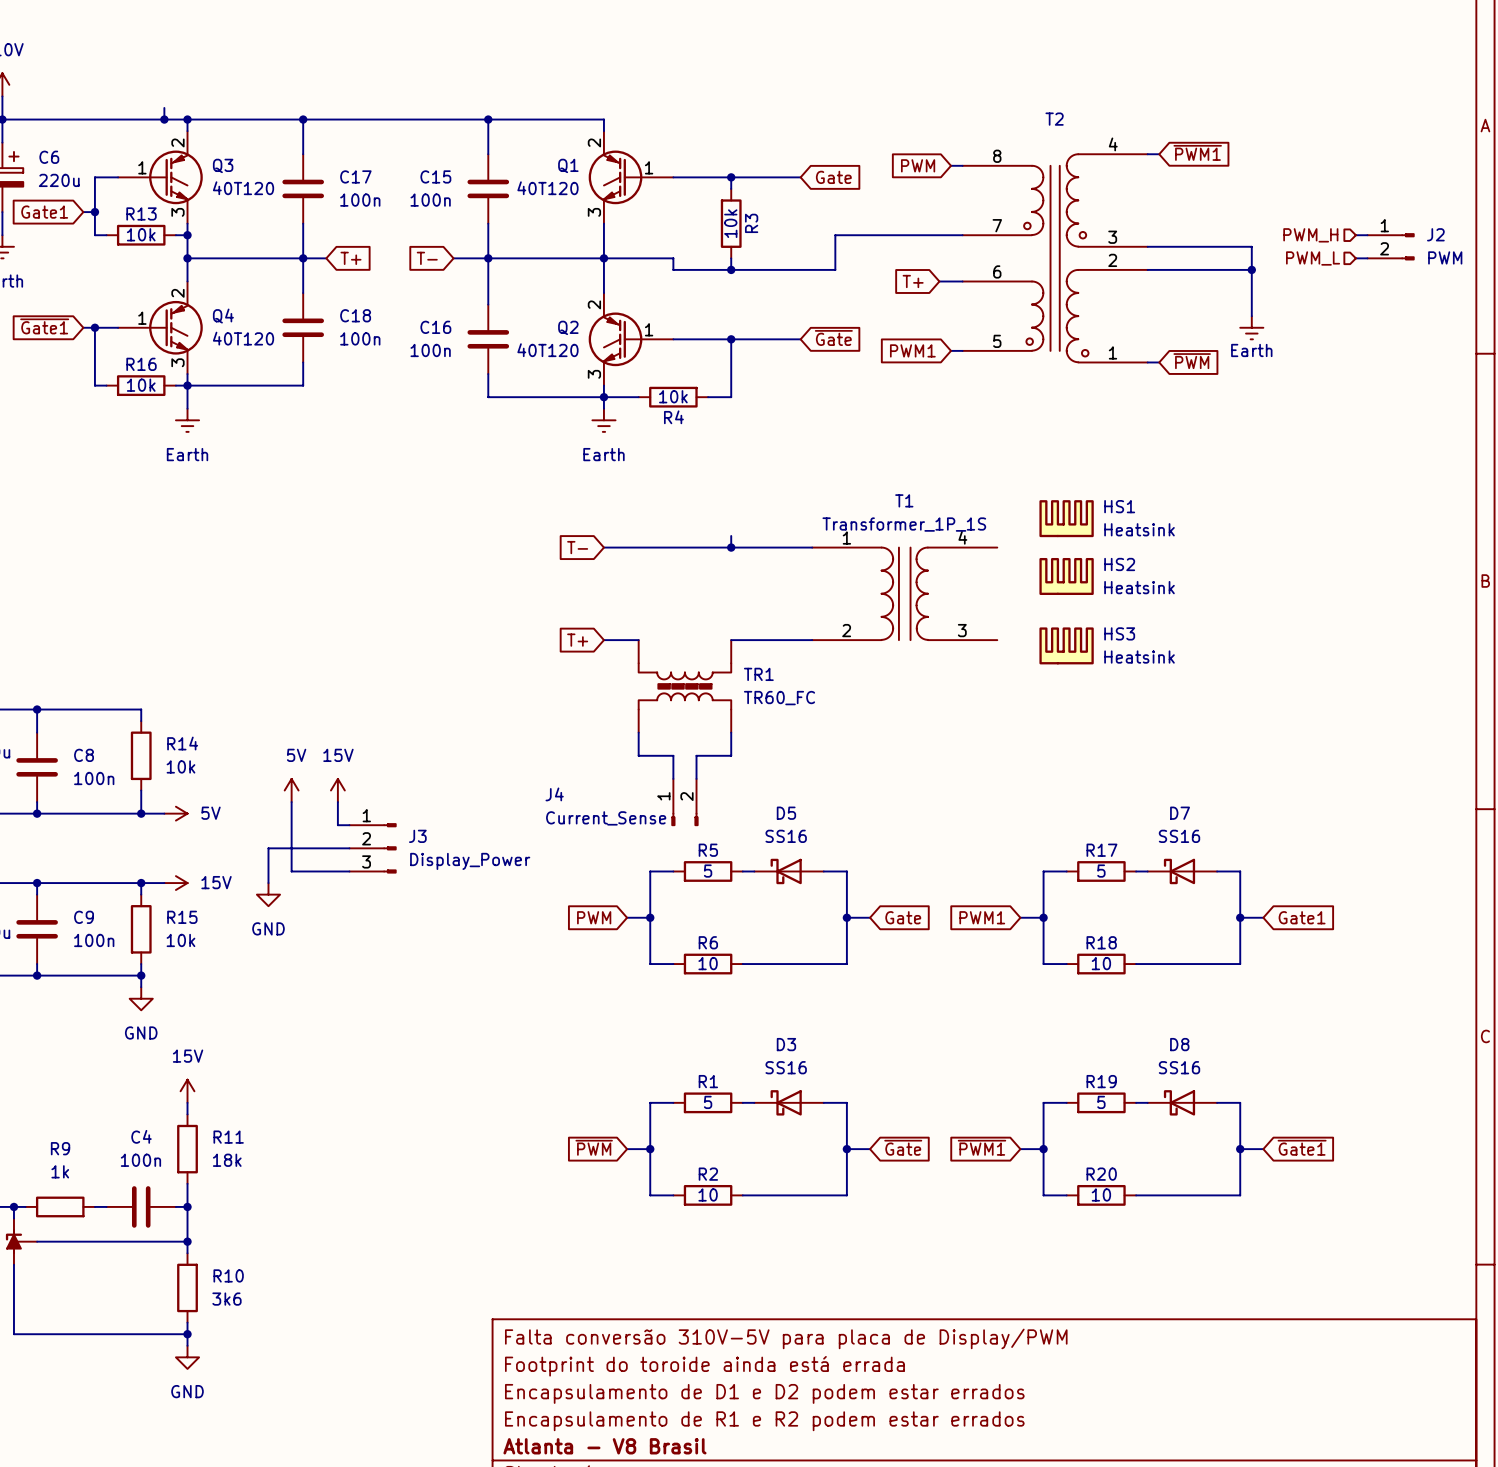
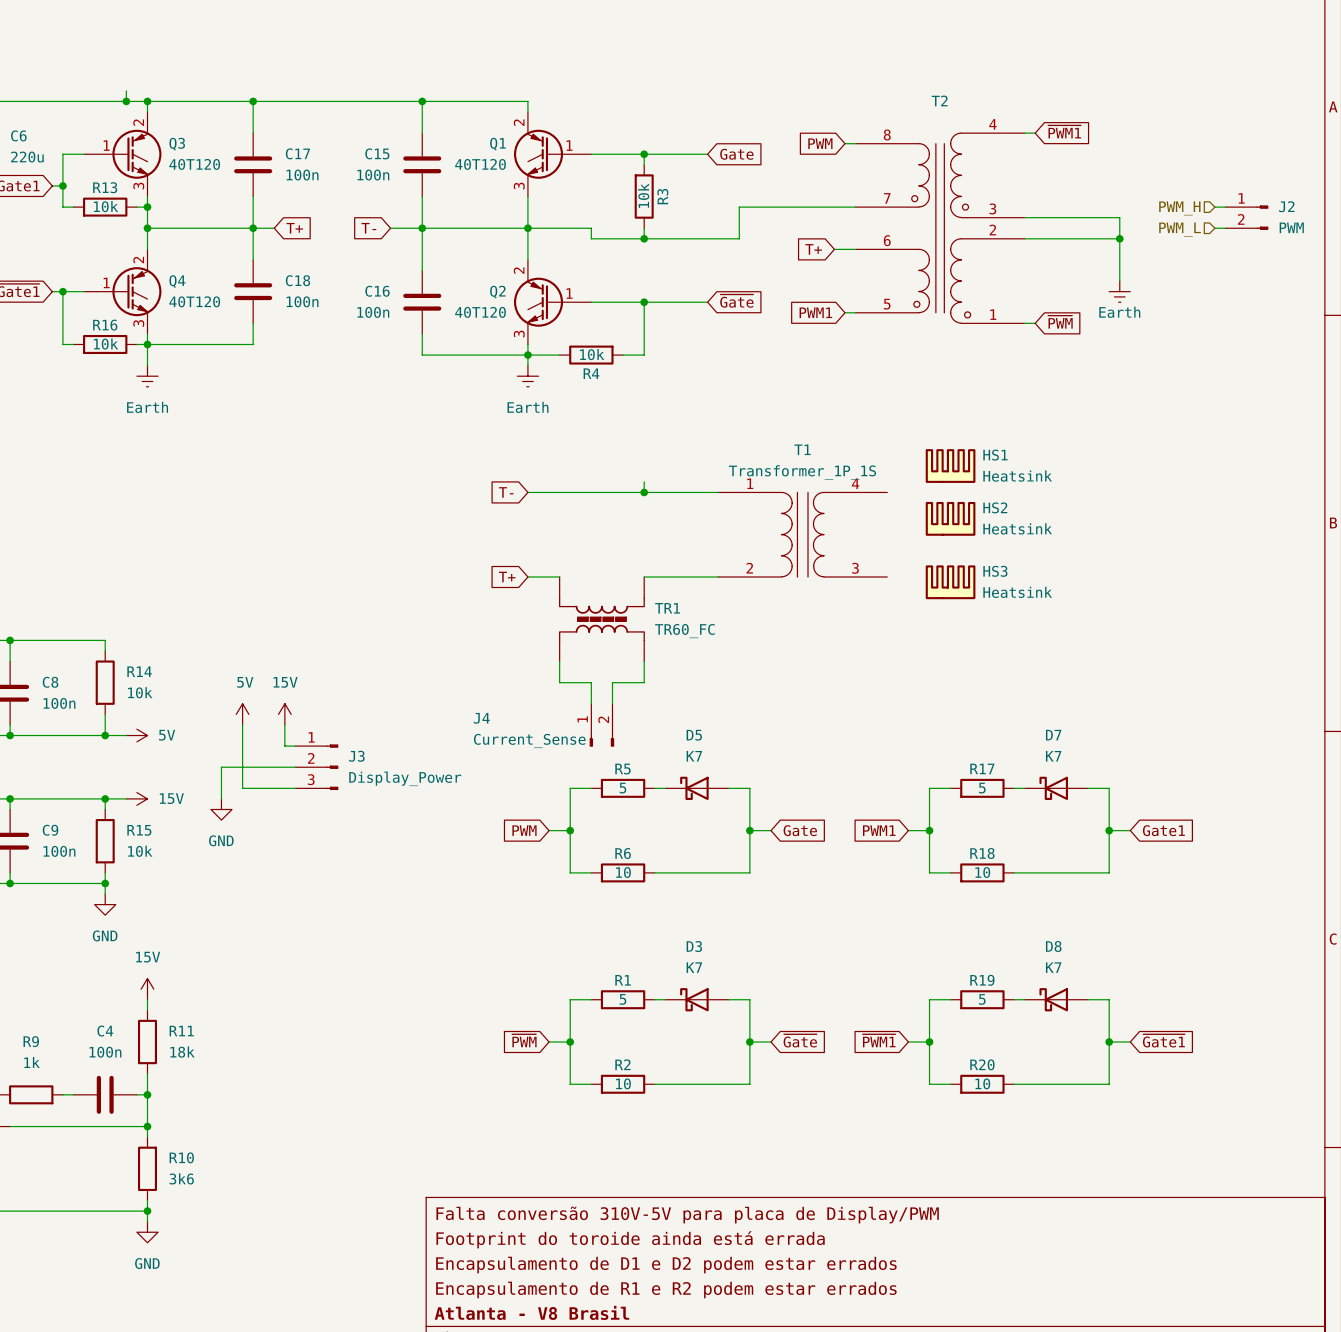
D5 value: SS16 (786, 836) -> K7 (694, 756)
D7 value: SS16 (1179, 836) -> K7 (1053, 756)
D3 value: SS16 (786, 1067) -> K7 (694, 967)
D8 value: SS16 (1179, 1067) -> K7 (1053, 967)

